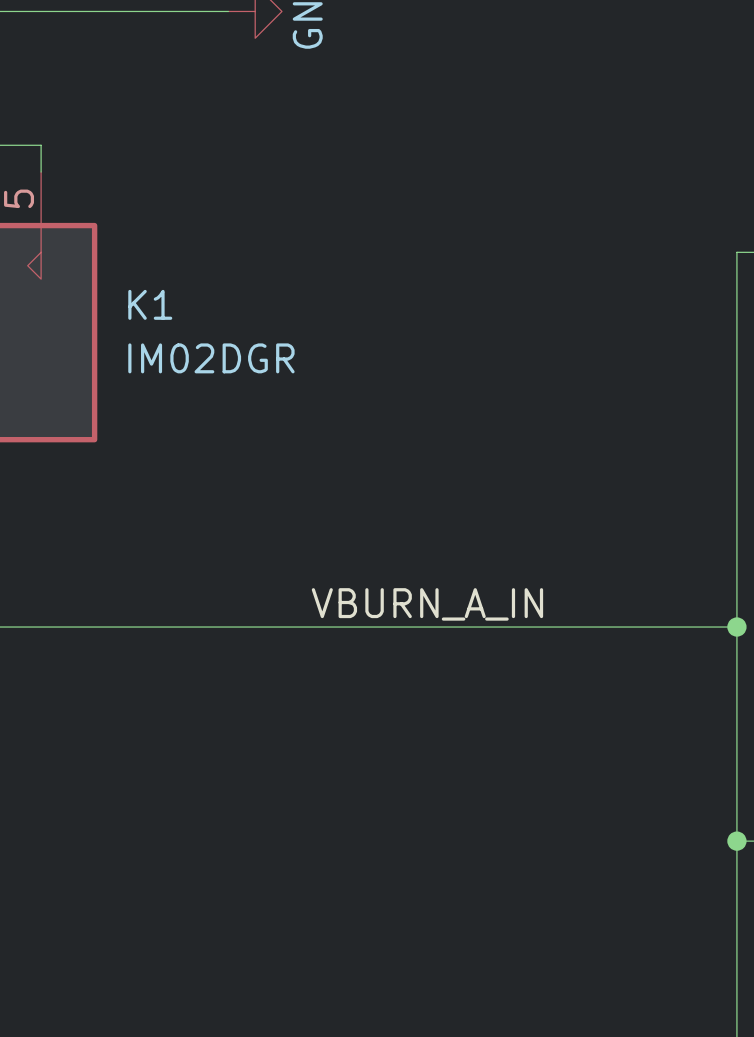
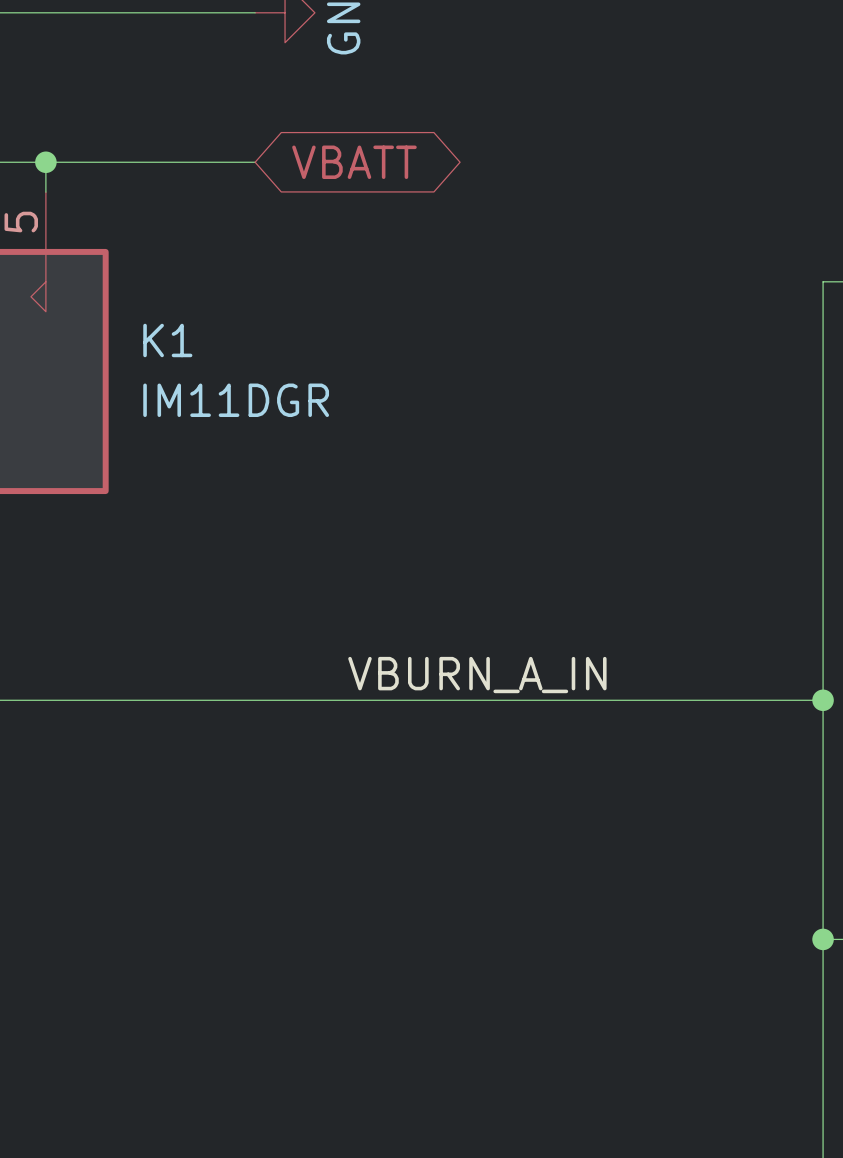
wire: none -> (45, 162) (255, 162)
junction: none -> (45, 162)
global label: none -> VBATT (354, 162)
K1 value: IM02DGR (211, 358) -> IM11DGR (236, 400)

